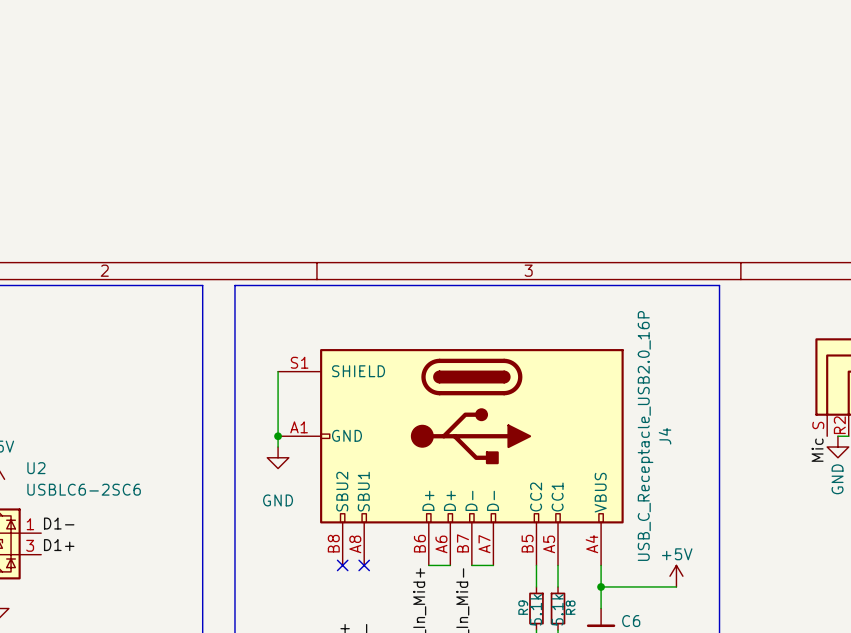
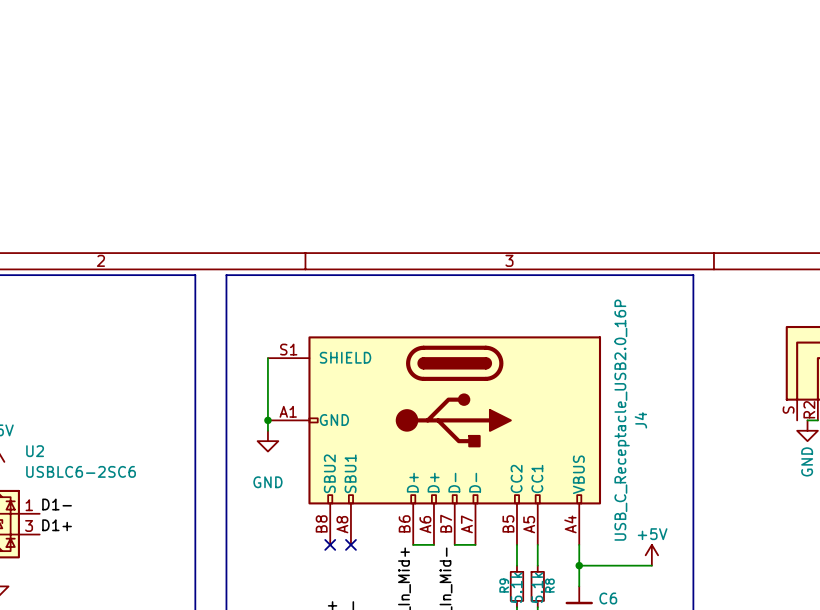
label: Mic (817, 450) -> none

